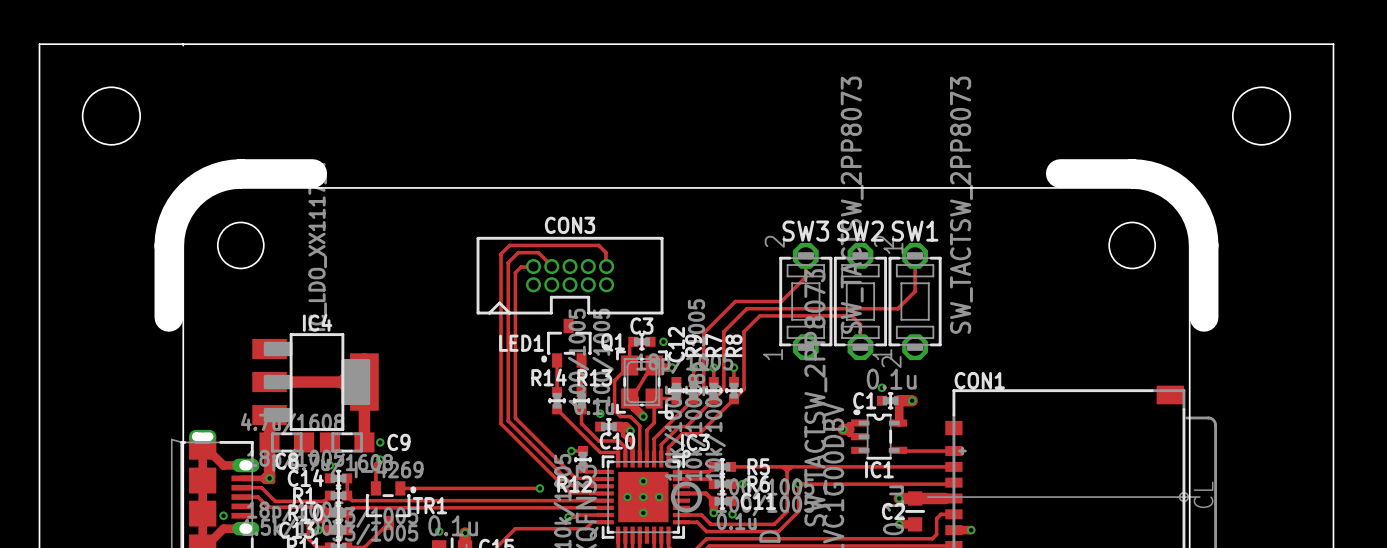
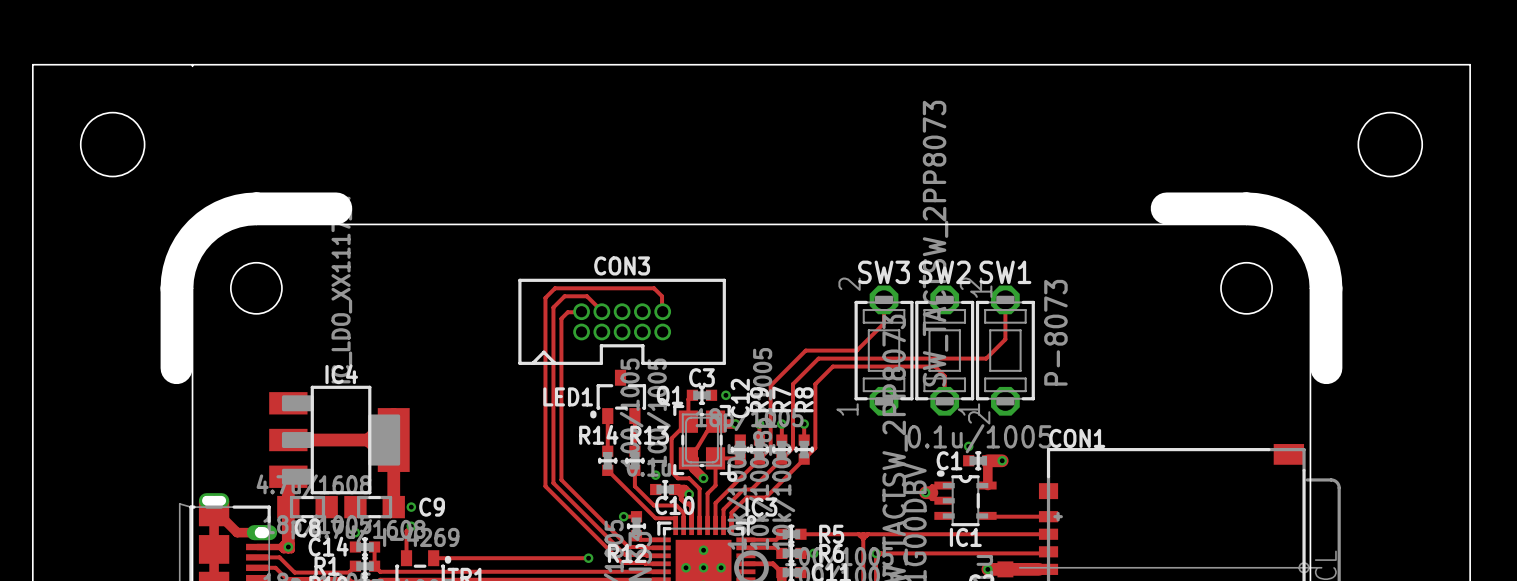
SW1 value: SW_TACTSW_2PP8073 (961, 205) -> P-8073 (1055, 332)
C1 value: 0.1u (891, 379) -> 0.1u/1005 (979, 438)

